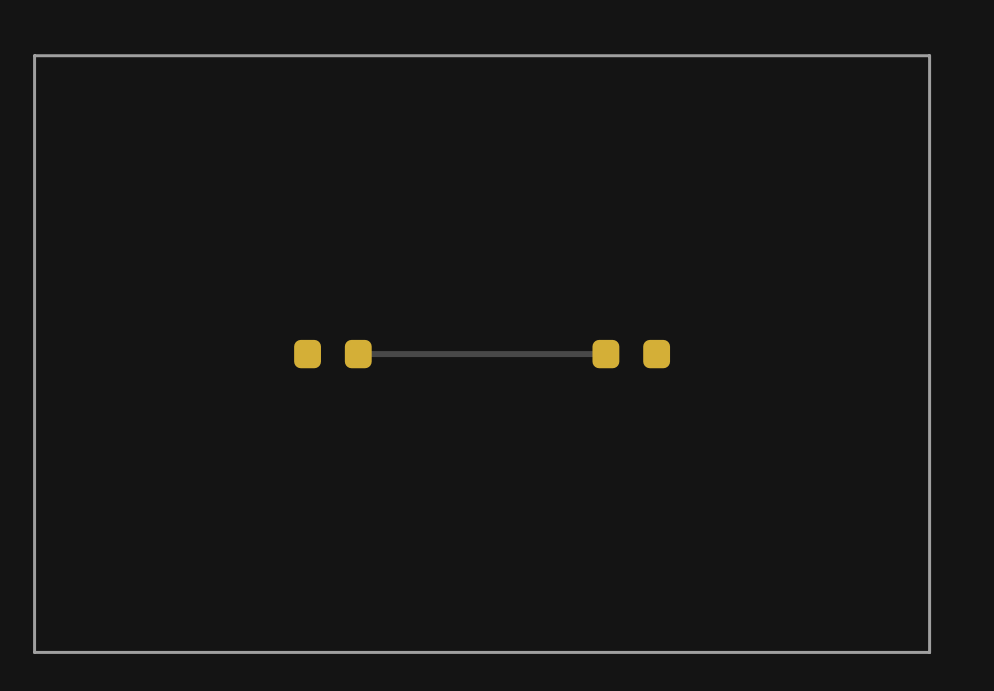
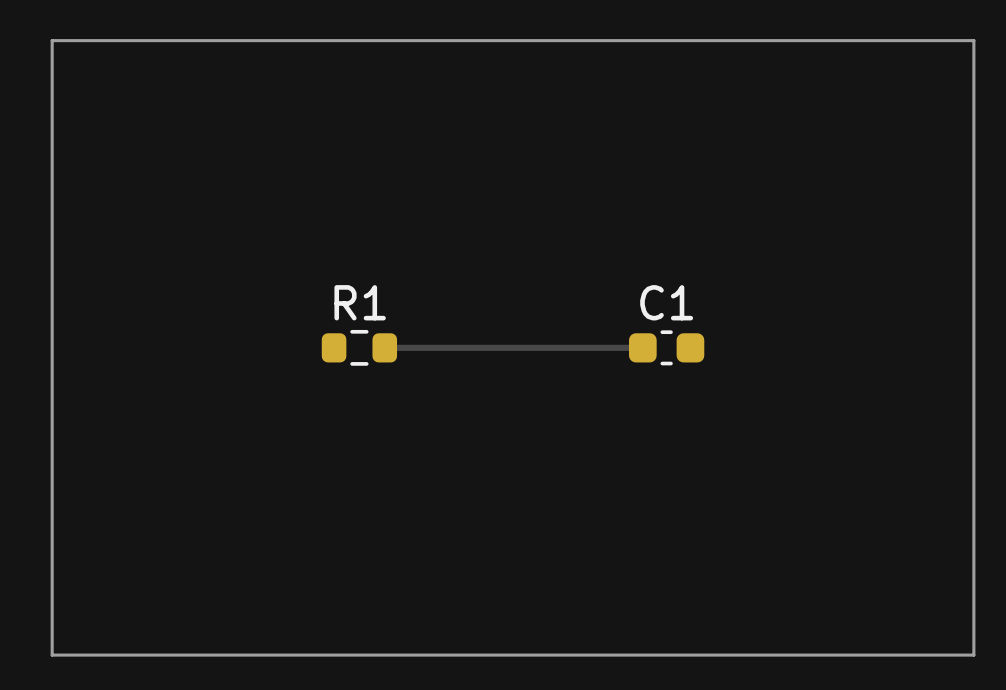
part: (332, 354) -> none
R1: none -> (359, 347)
part: (631, 354) -> none
C1: none -> (666, 347)

